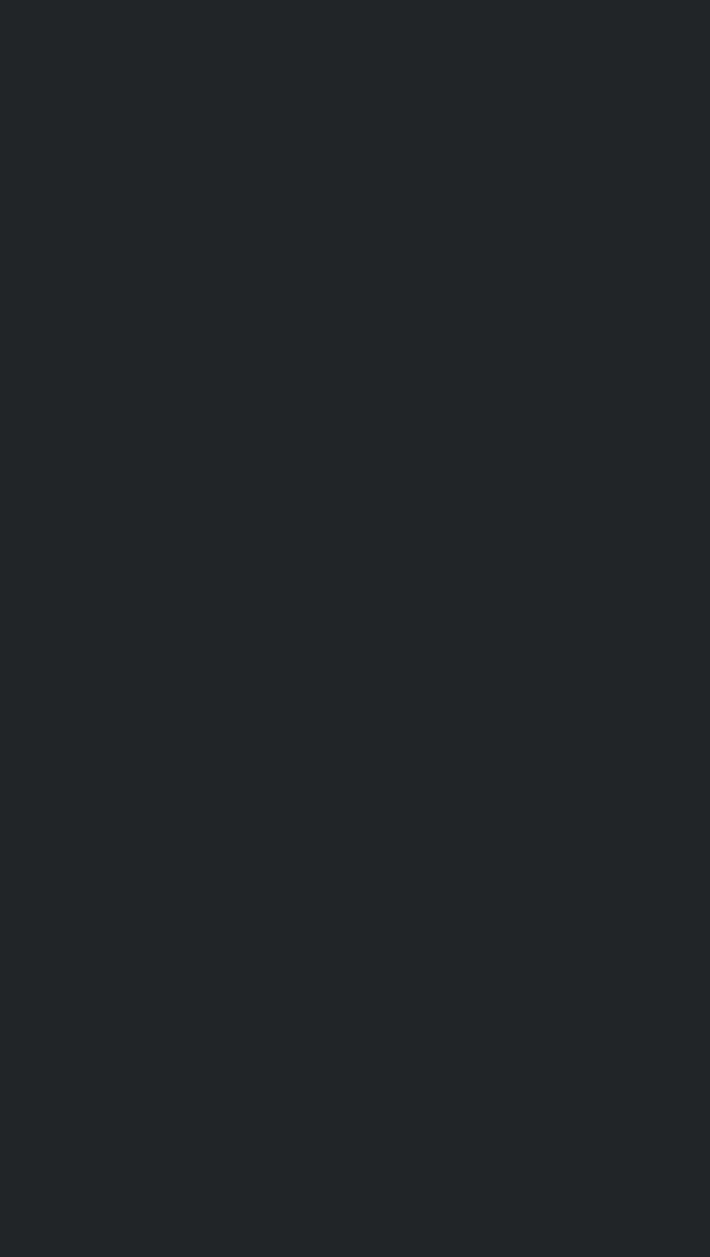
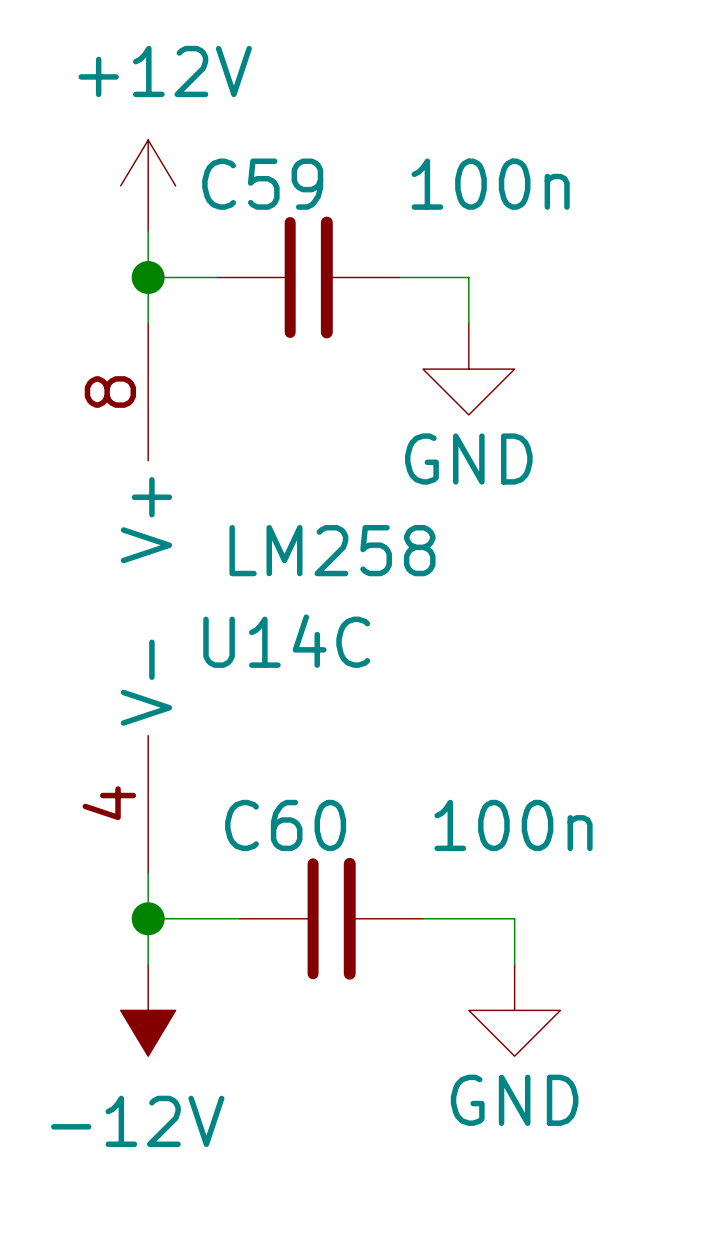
power symbol: none -> +12V (148, 185)
wire: none -> (148, 231) (148, 323)
wire: none -> (148, 277) (216, 277)
junction: none -> (148, 277)
C59: none -> 100n (308, 277)
wire: none -> (400, 277) (468, 277) (468, 323)
power symbol: none -> GND (468, 369)
U14C: none -> LM258 (148, 598)
wire: none -> (148, 872) (148, 964)
wire: none -> (148, 918) (239, 918)
junction: none -> (148, 918)
C60: none -> 100n (331, 918)
wire: none -> (423, 918) (514, 918) (514, 964)
power symbol: none -> -12V (148, 1010)
power symbol: none -> GND (514, 1010)

